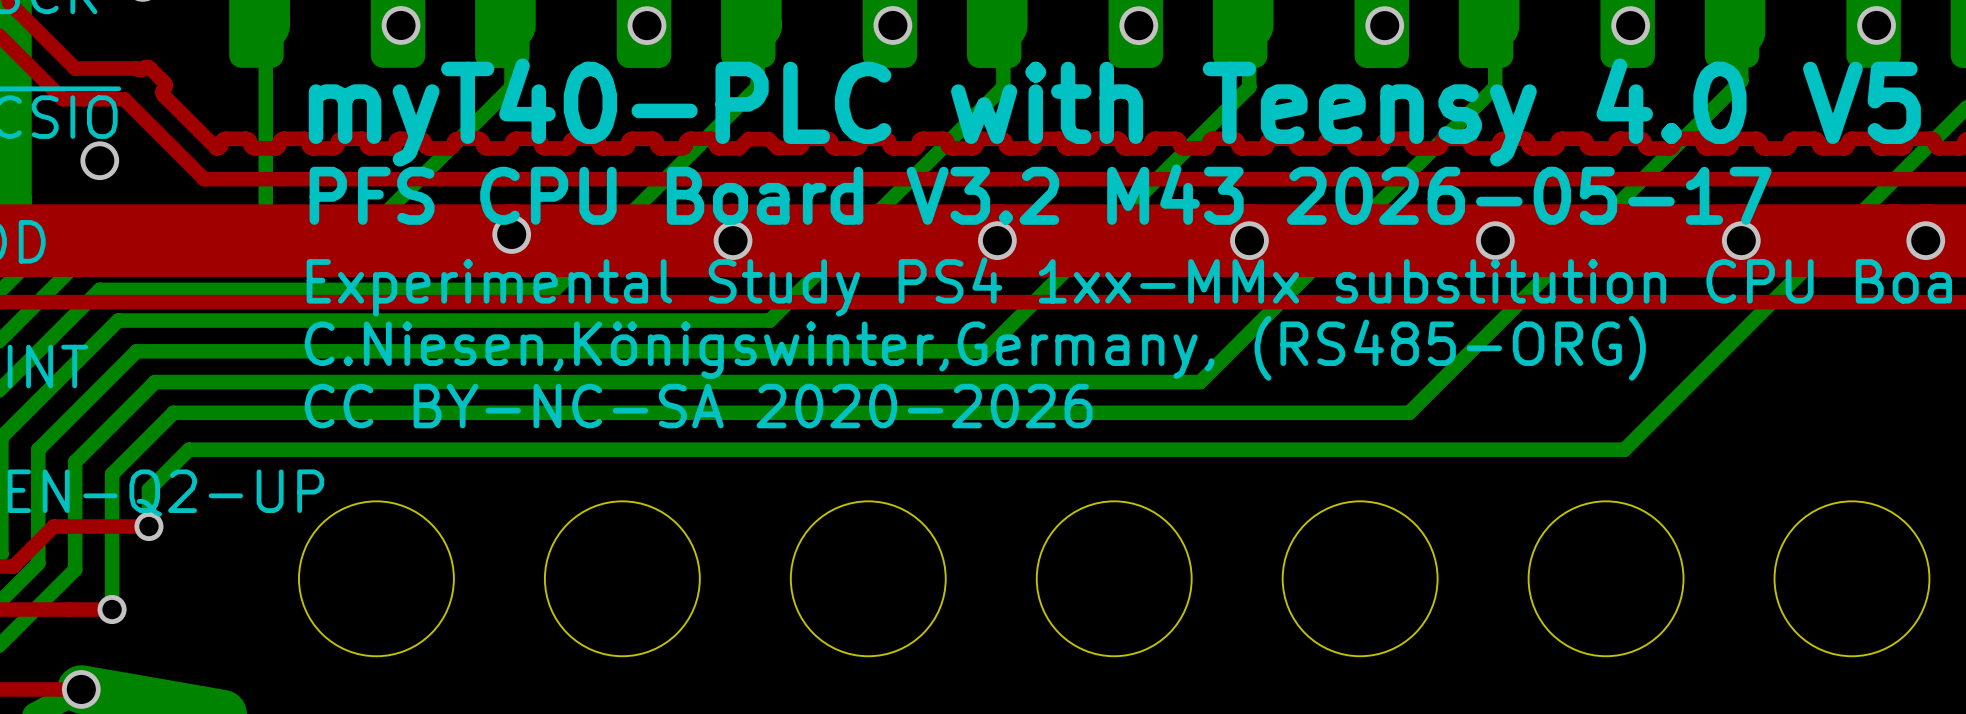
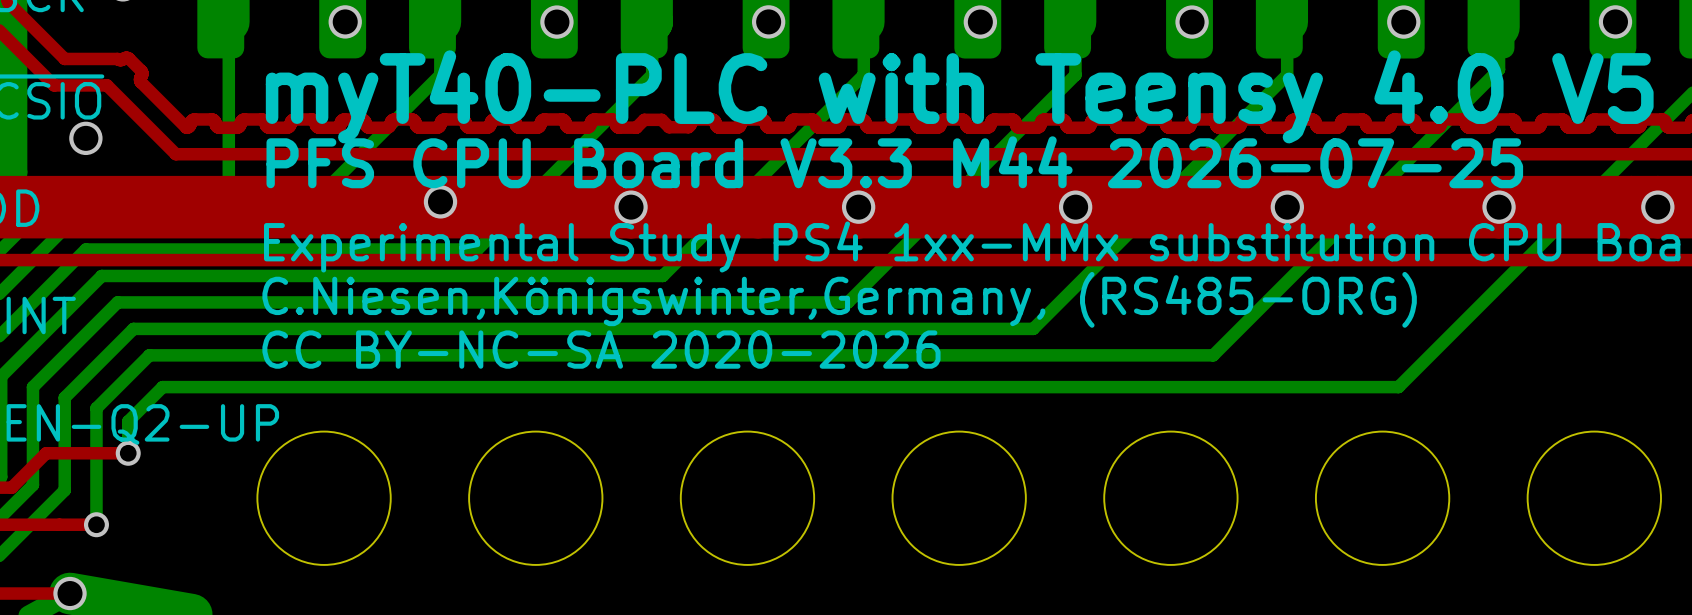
text: PFS CPU Board V3.2 M43 2026-05-17 (1040, 194) -> PFS CPU Board V3.3 M44 2026-07-25 (894, 162)

